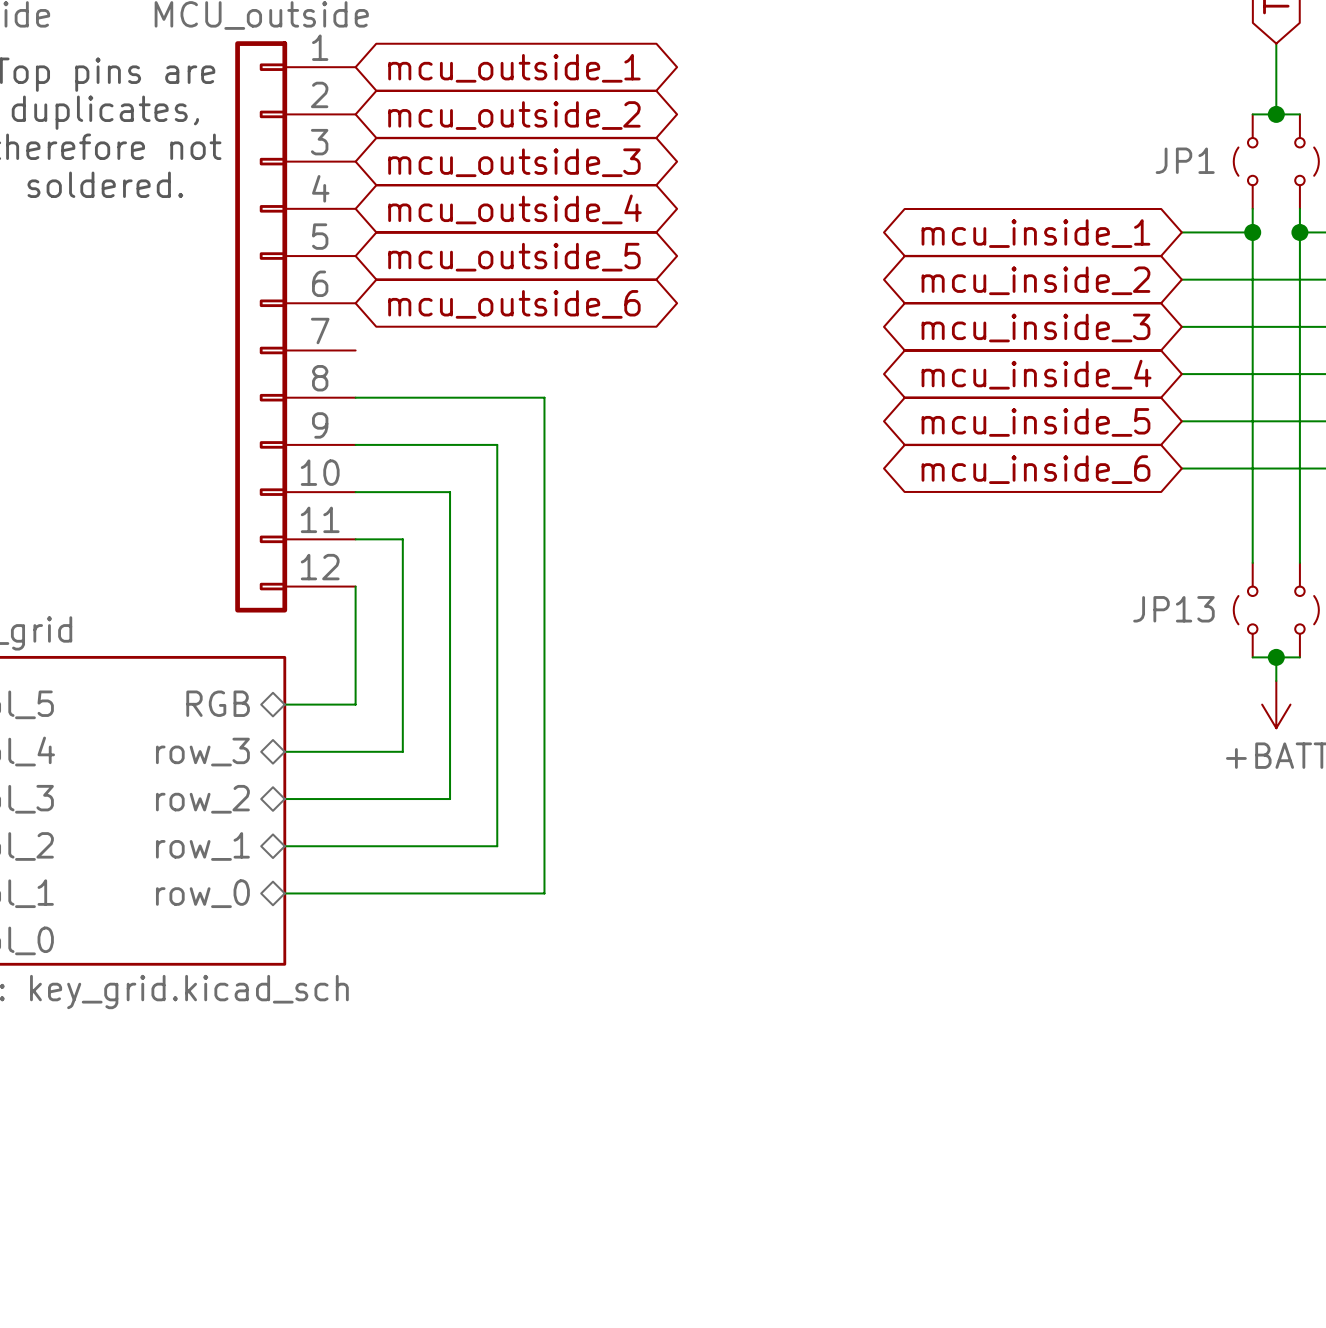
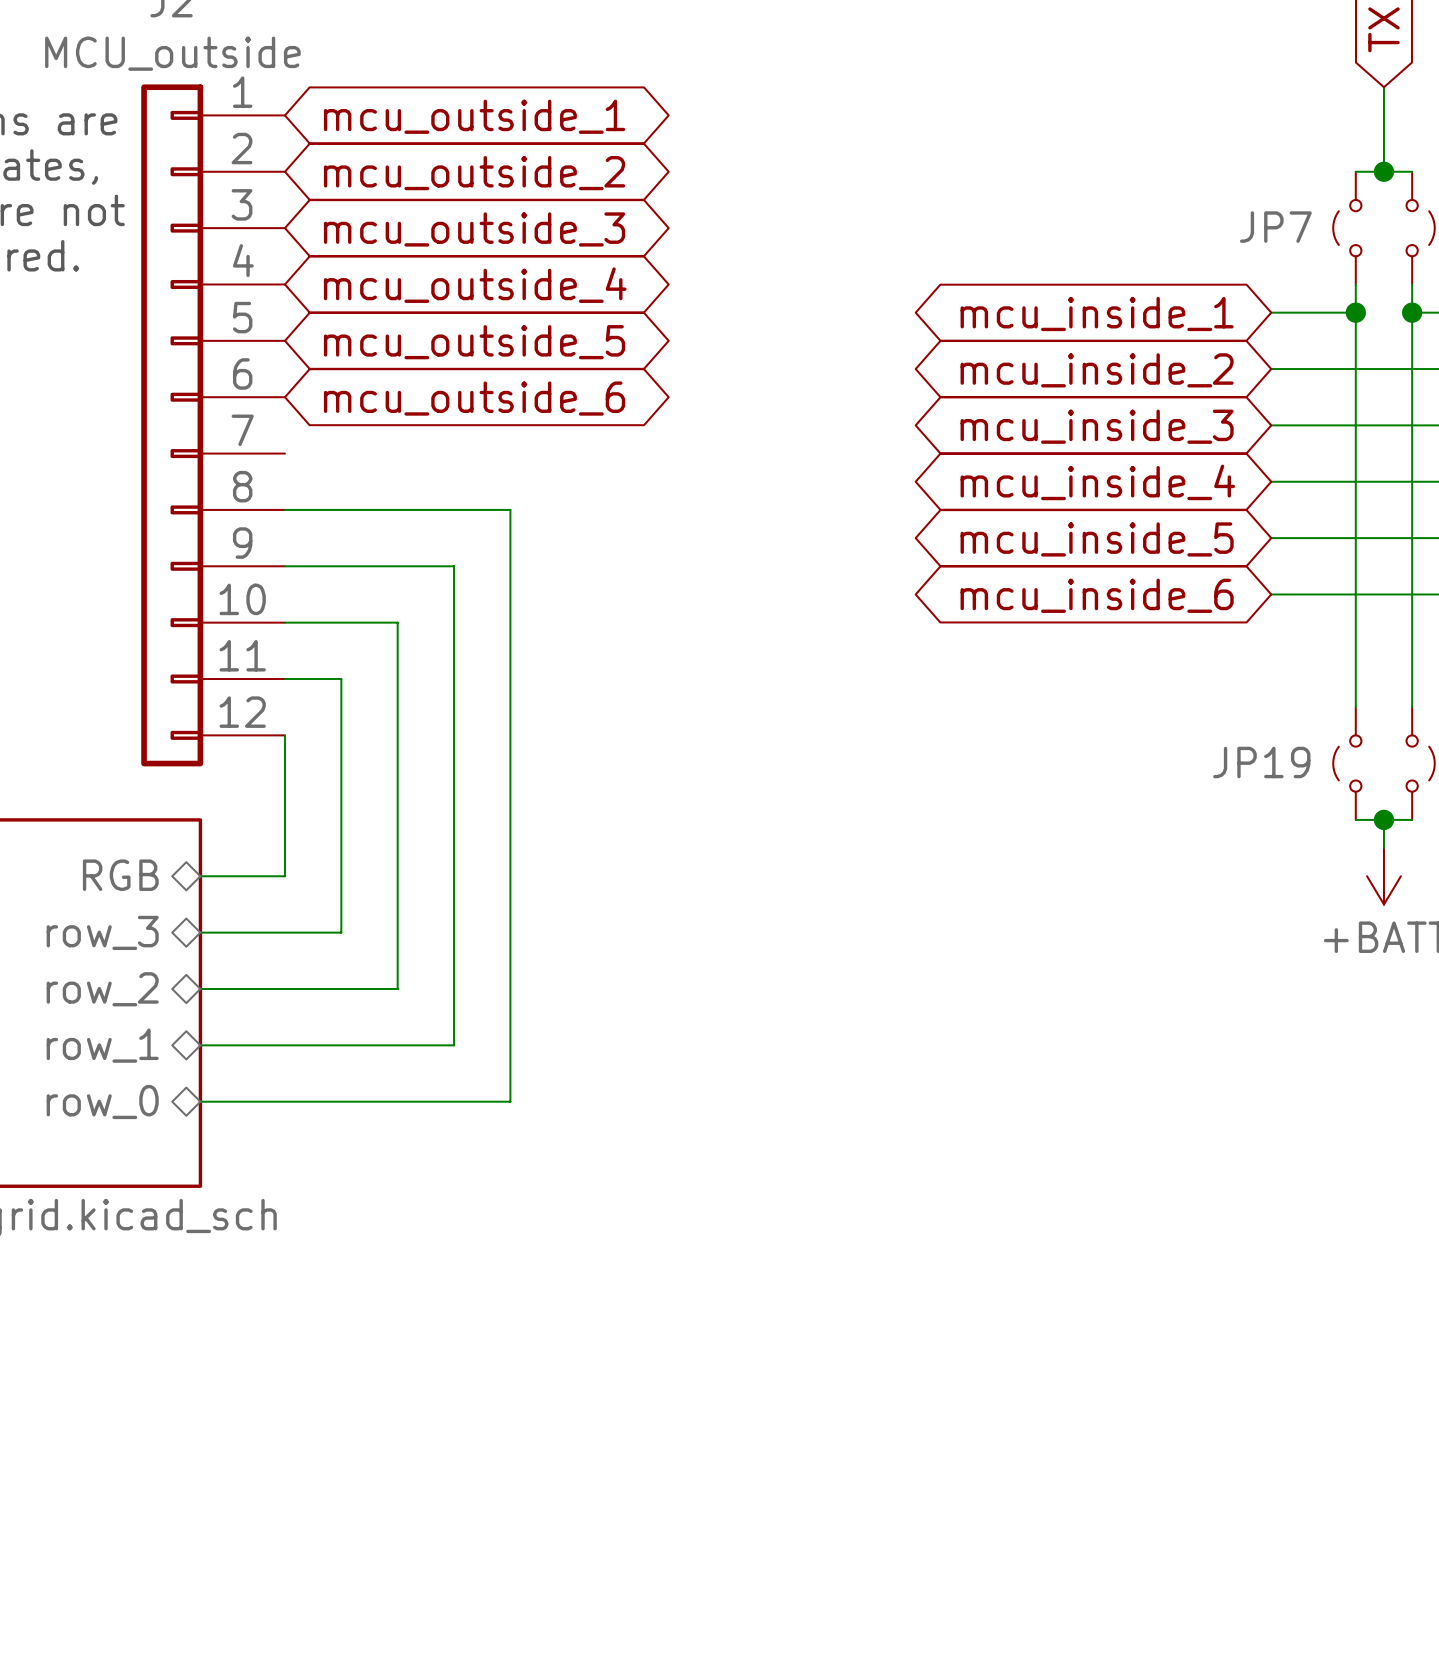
JP1 name: JP1 (1185, 160) -> JP7 (1275, 227)
JP13 name: JP13 (1173, 609) -> JP19 (1261, 762)

